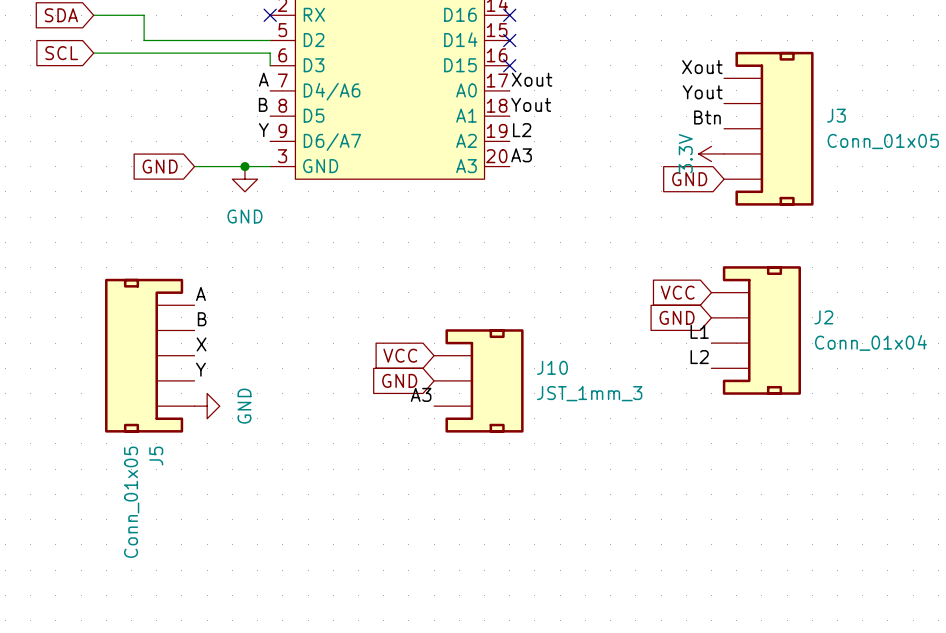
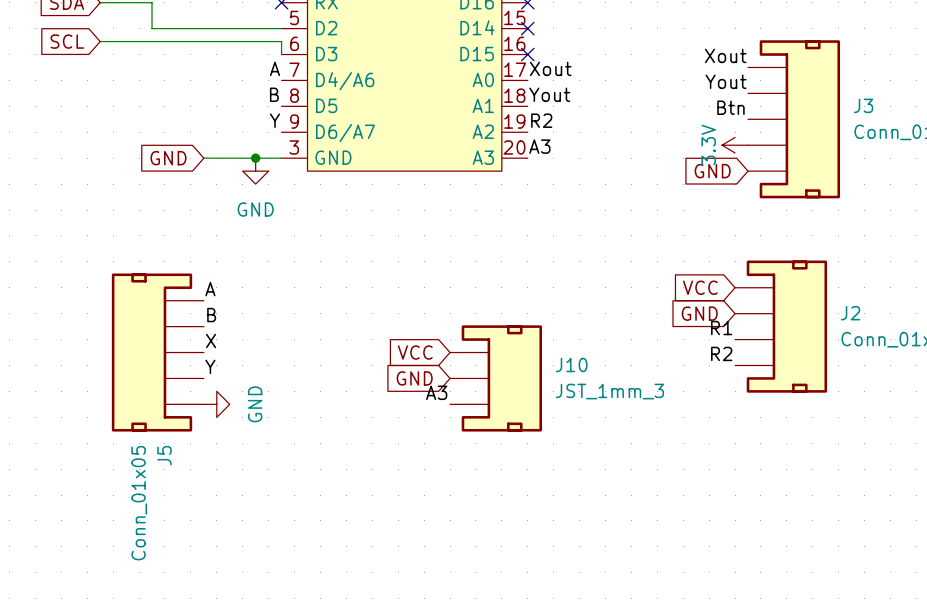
label: L2 (522, 130) -> R2 (541, 120)
label: L1 (699, 331) -> R1 (721, 328)
label: L2 (699, 357) -> R2 (721, 353)

